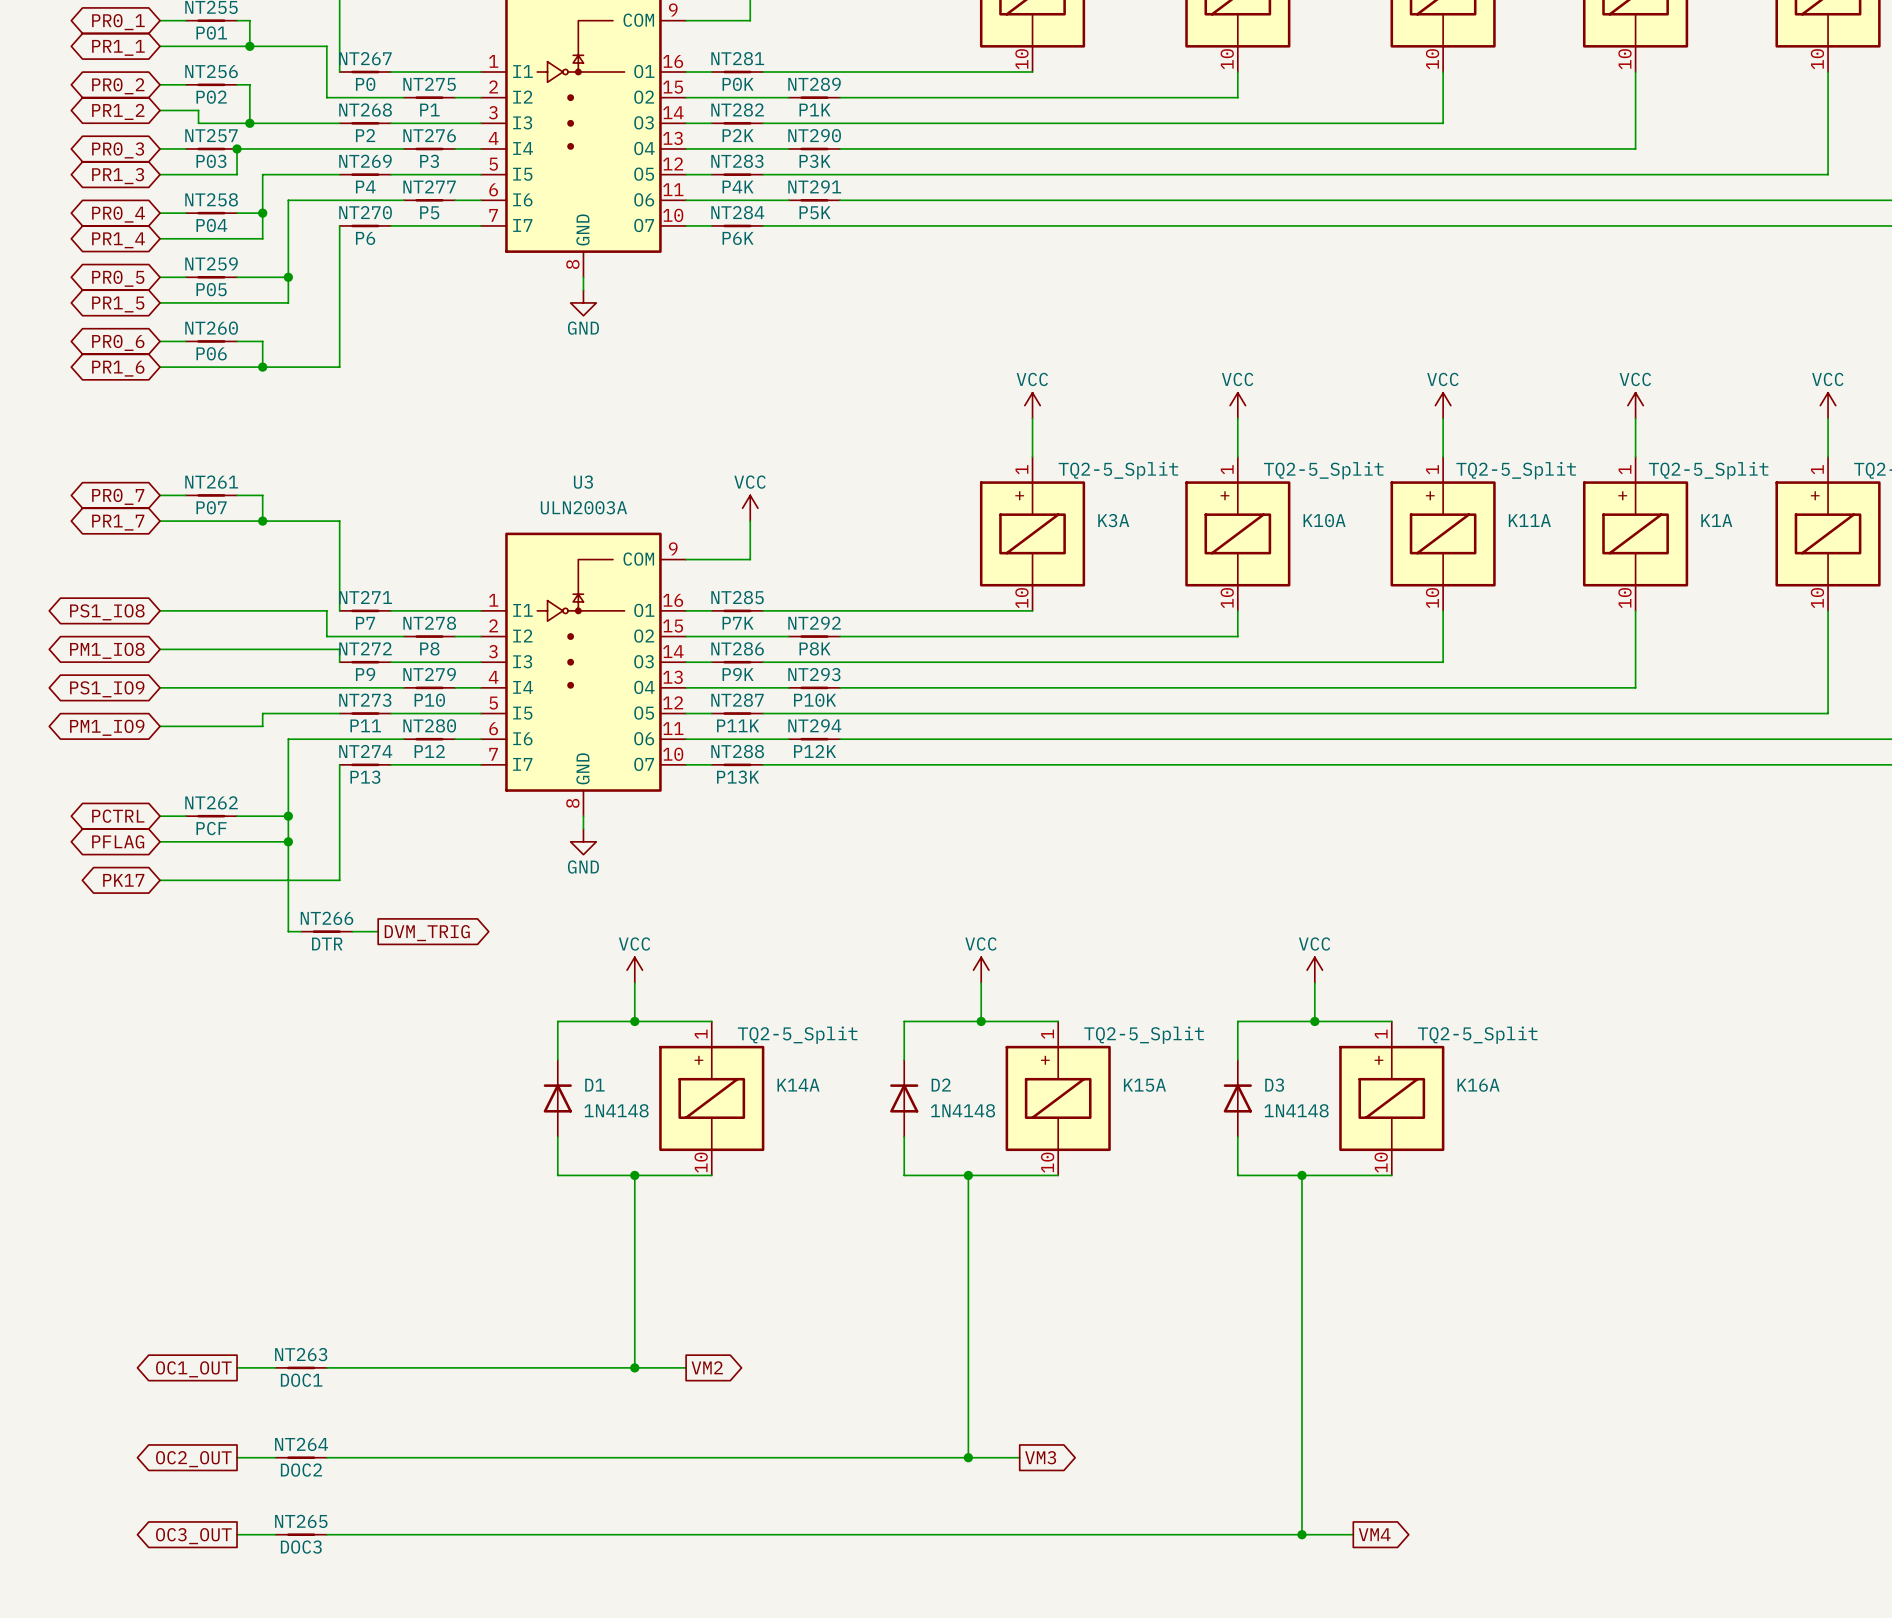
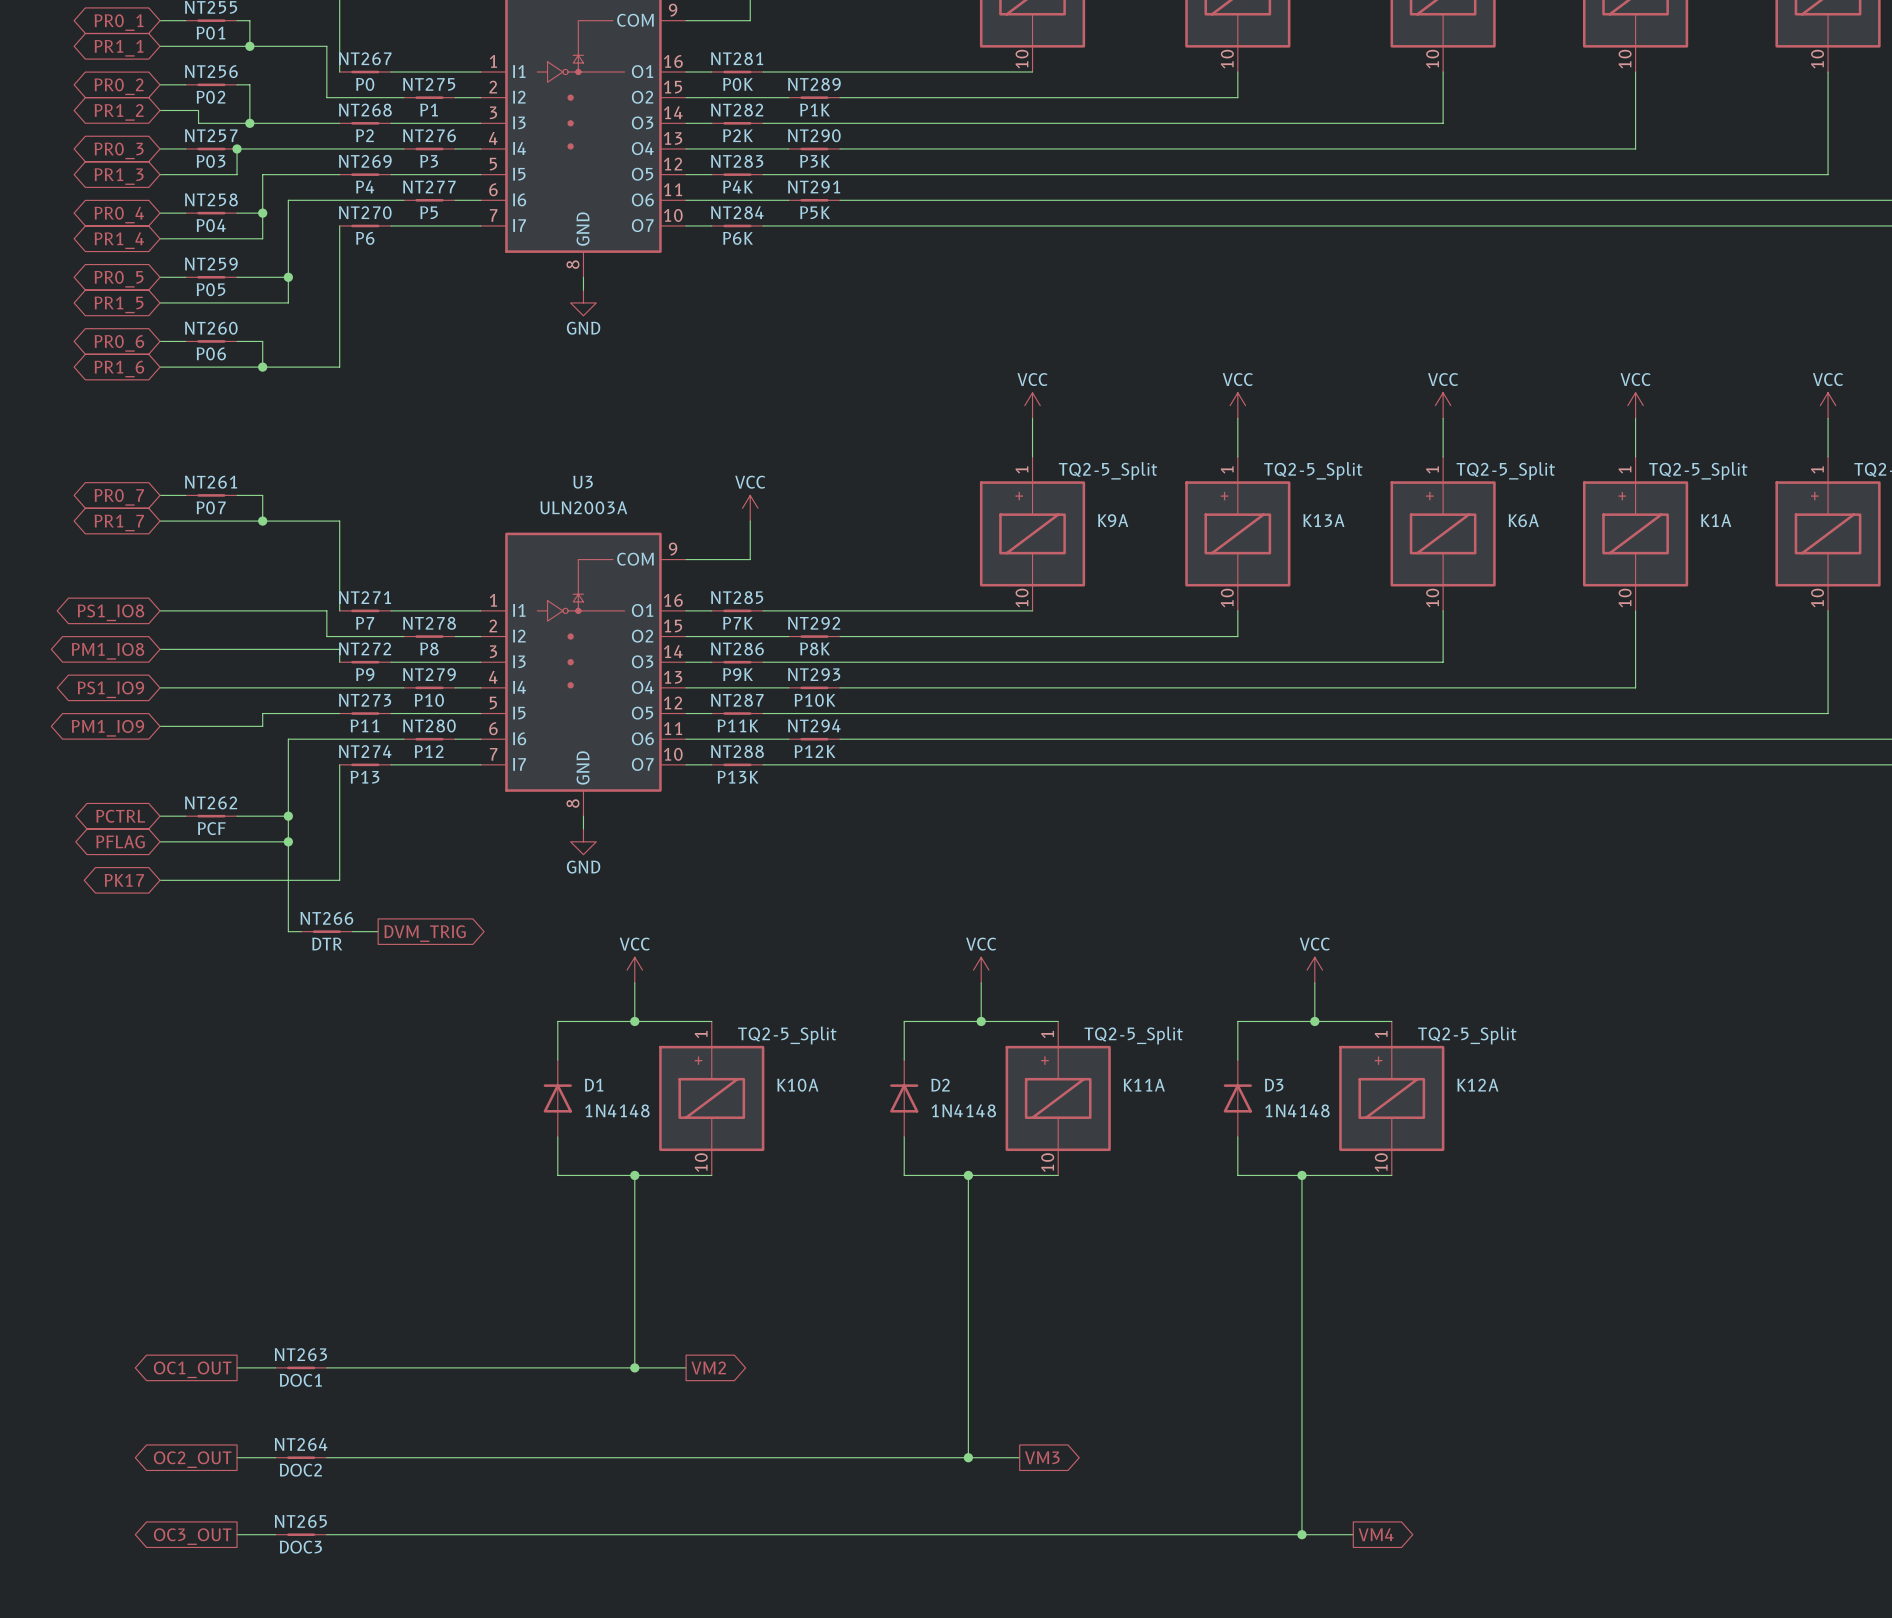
K3A name: K3A (1113, 520) -> K9A (1113, 520)
K10A name: K10A (1324, 520) -> K13A (1323, 520)
K11A name: K11A (1529, 520) -> K6A (1523, 520)
K14A name: K14A (798, 1085) -> K10A (797, 1085)
K15A name: K15A (1144, 1085) -> K11A (1144, 1085)
K16A name: K16A (1478, 1085) -> K12A (1477, 1085)

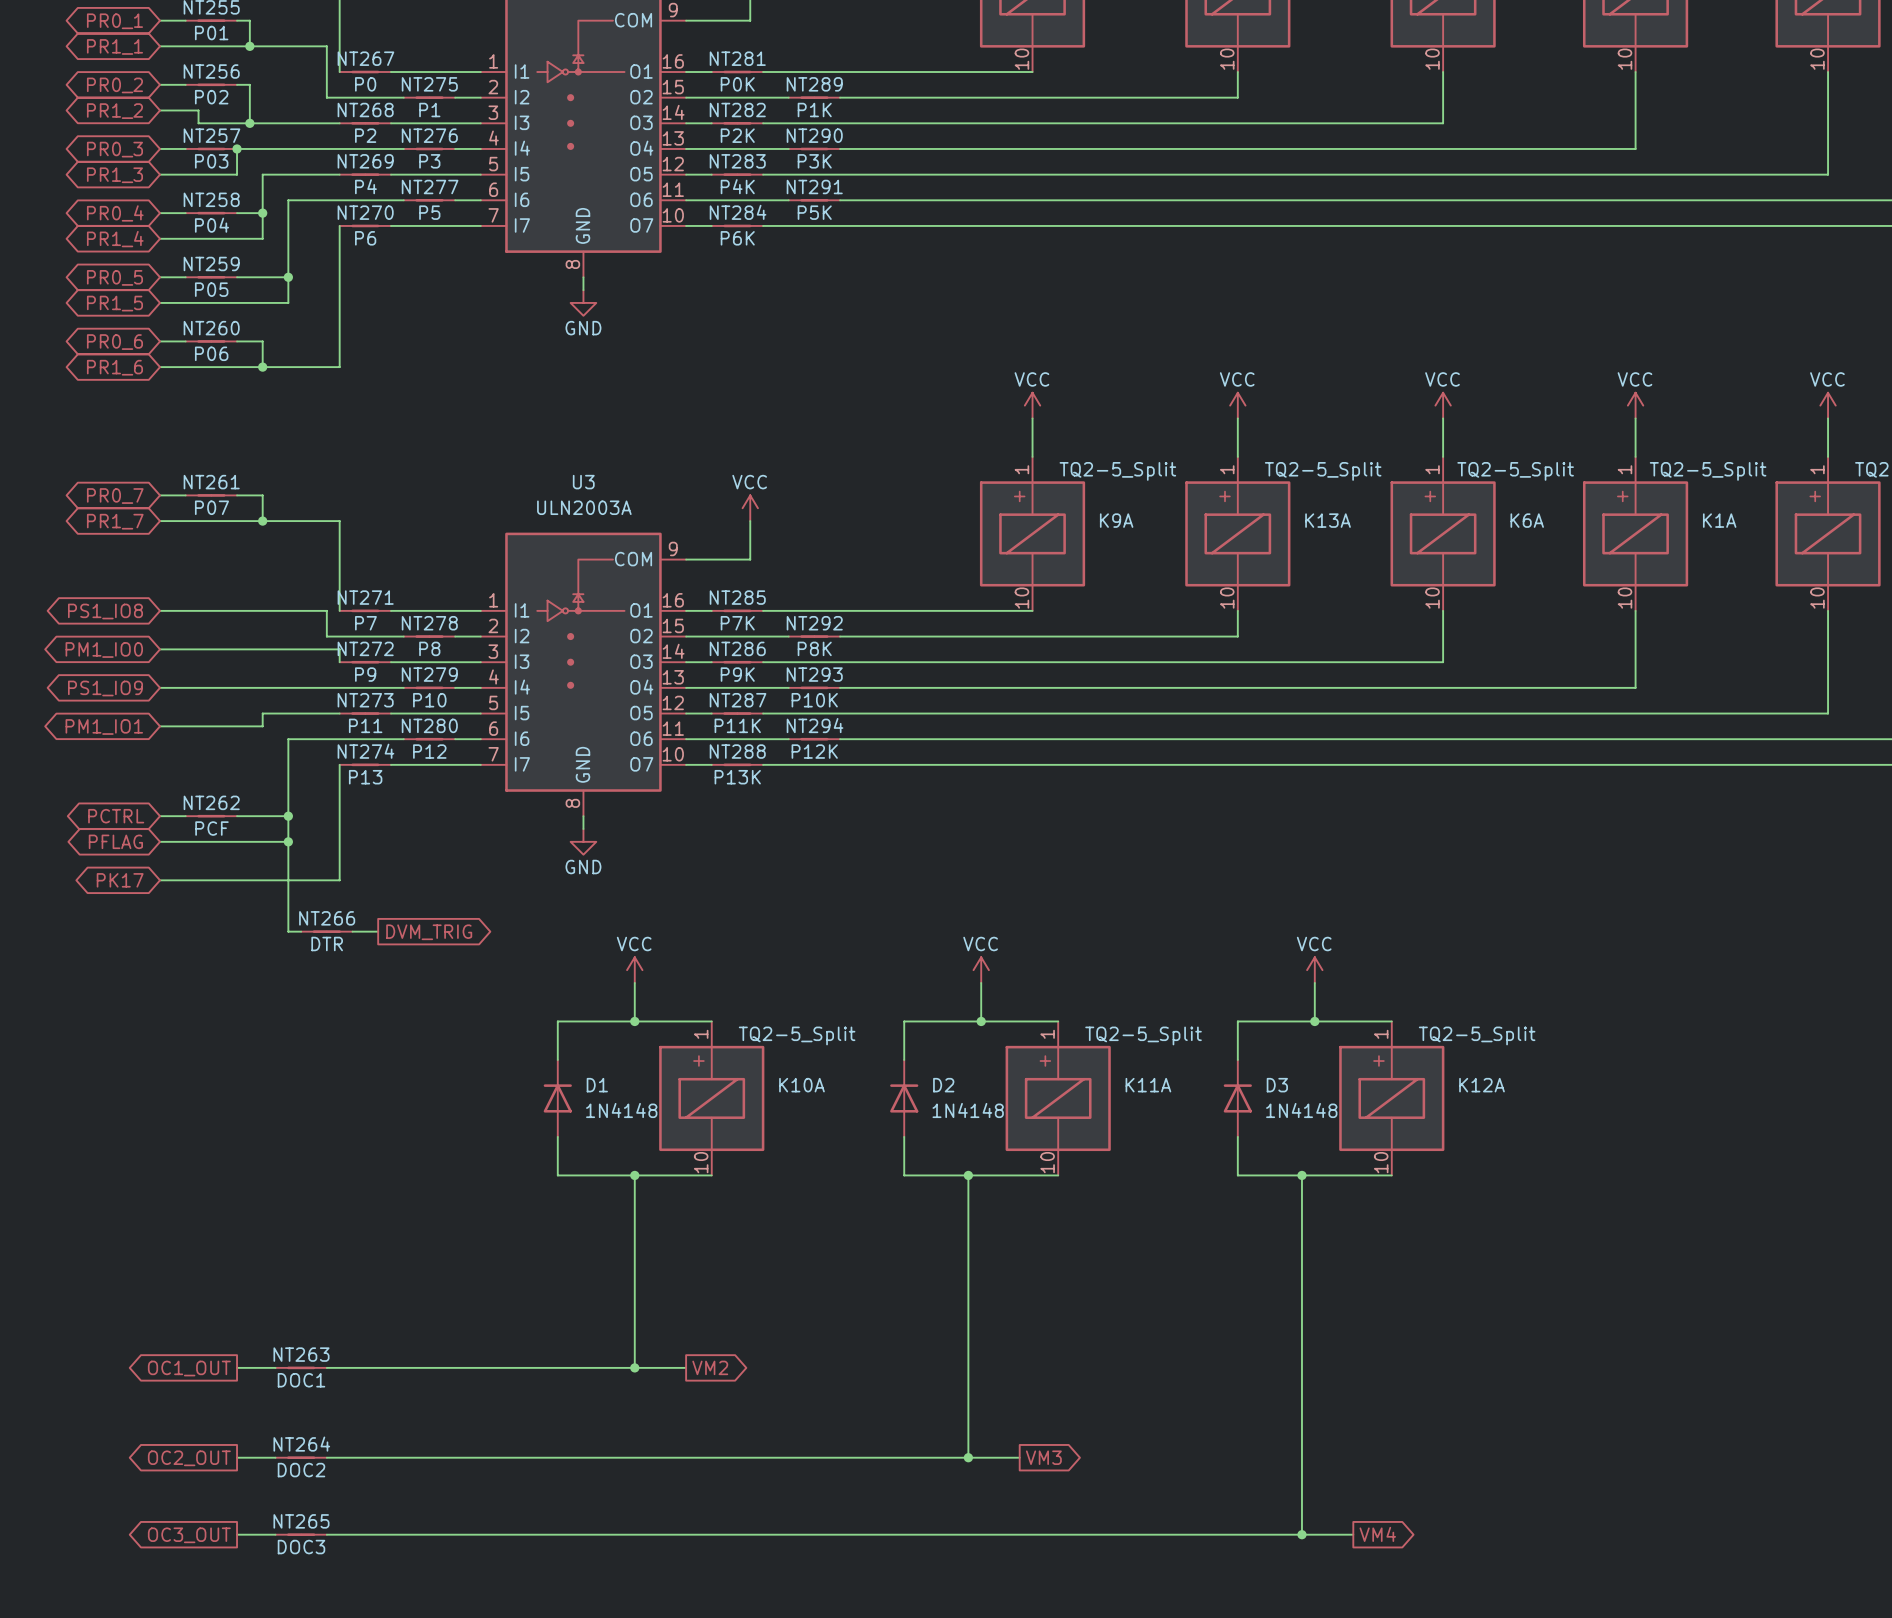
global label: PM1_IO8 (107, 651) -> PM1_IO0 (104, 649)
global label: PM1_IO9 (107, 728) -> PM1_IO1 (104, 726)

